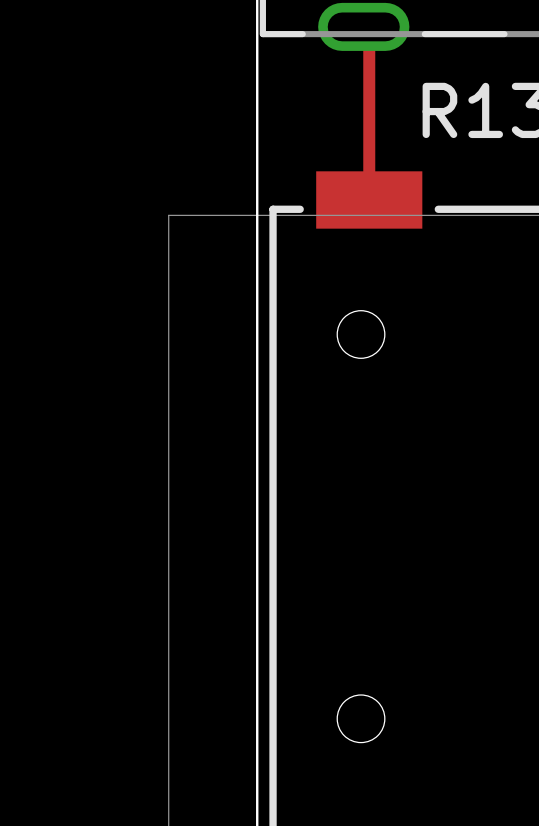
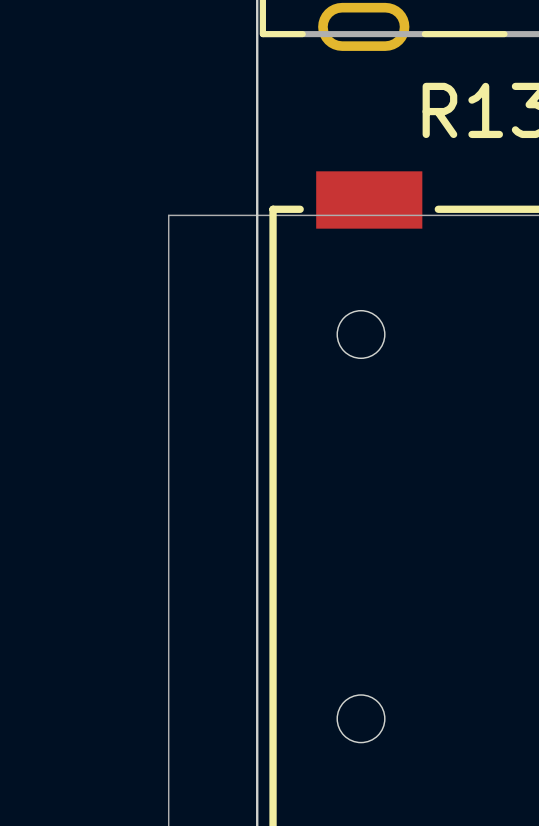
track: (363, 26) (369, 32) (369, 199) -> none

